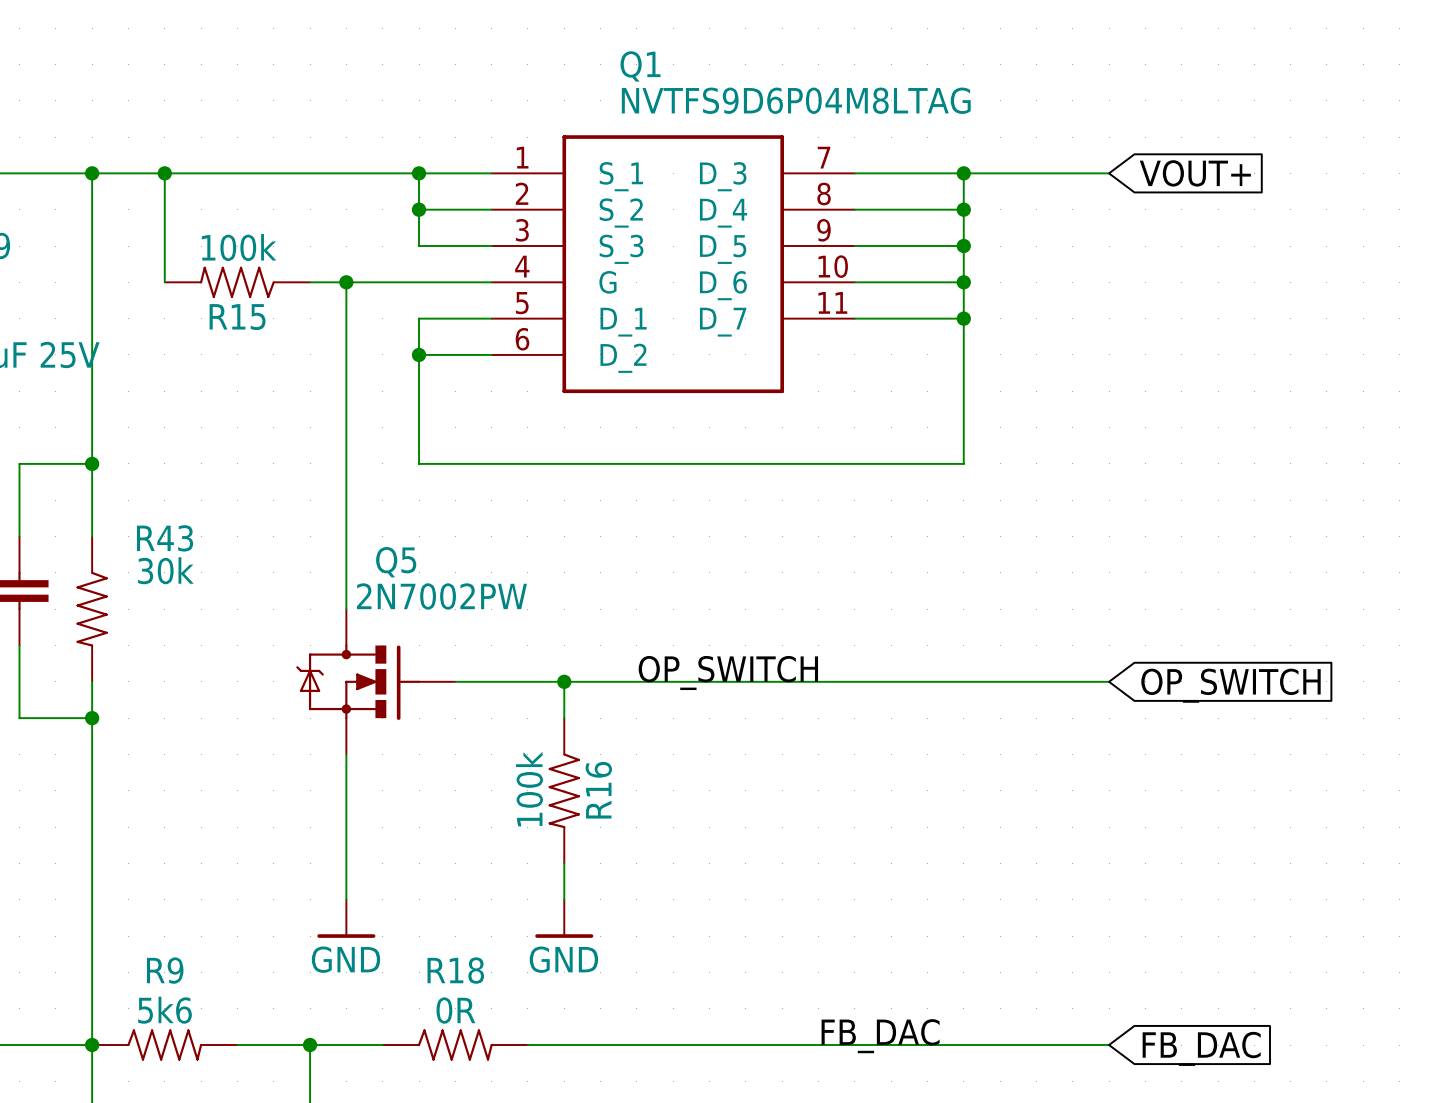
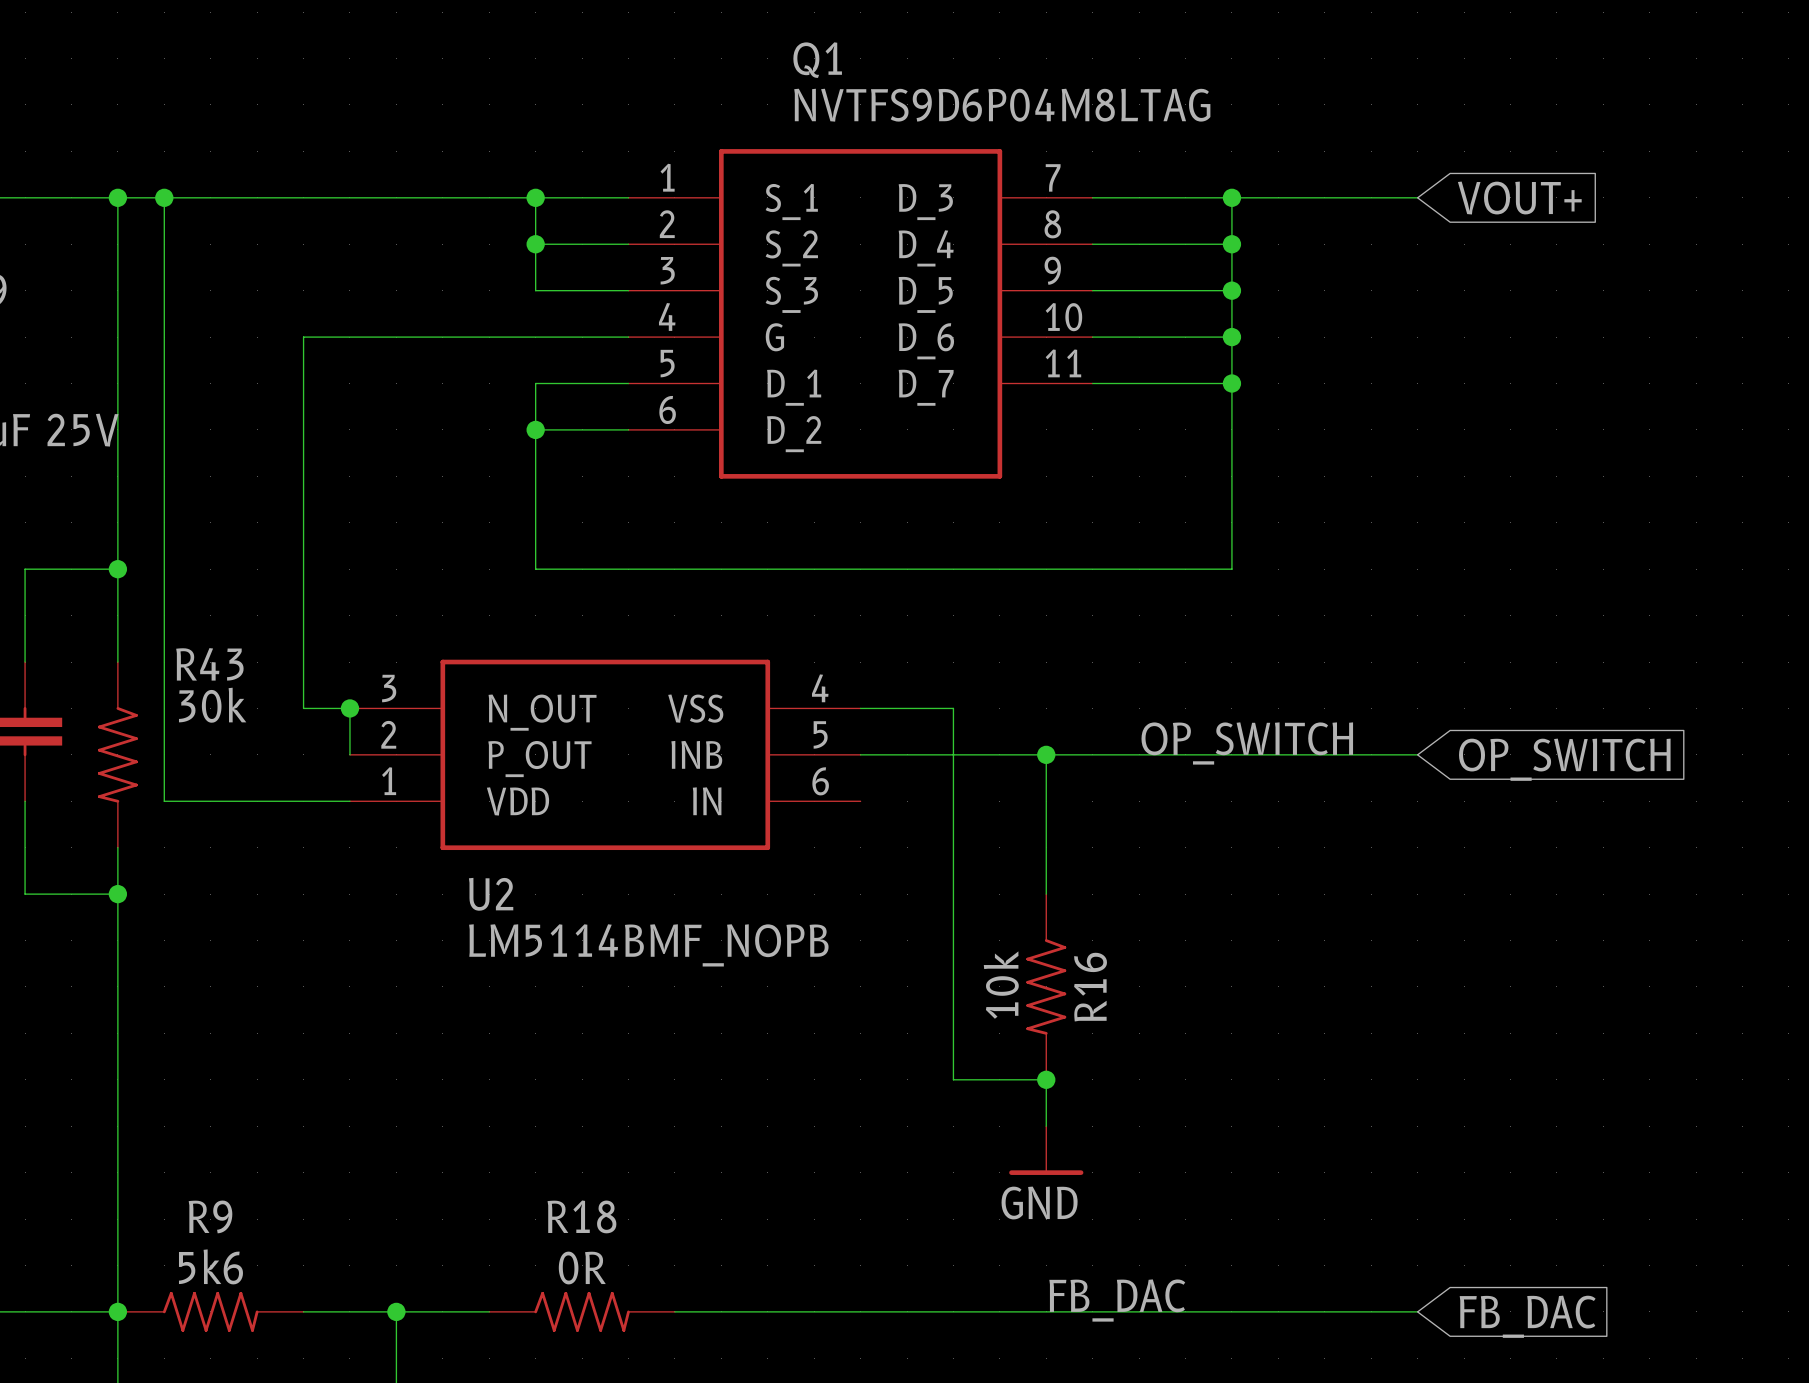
wire: none -> (164, 197) (164, 801) (349, 801)
wire: (164, 173) (164, 282) -> none
junction position: (164, 173) -> (164, 197)
R15: 100k (237, 282) -> none
wire: none -> (396, 337) (303, 337) (303, 708) (349, 708) (349, 754)
wire: (346, 282) (346, 609) -> none
junction: (346, 282) -> none
junction: none -> (349, 708)
wire: none -> (860, 708) (953, 708) (953, 1079) (1046, 1079) (1046, 1126)
U2: none -> LM5114BMF_NOPB (605, 754)
wire: none -> (860, 754) (1417, 754)
wire: none -> (1046, 754) (1046, 894)
junction: none -> (1046, 754)
label position: OP_SWITCH (728, 672) -> OP_SWITCH (1247, 743)
Q5: 2N7002PW (375, 681) -> none
wire: (455, 681) (1109, 681) -> none
wire: (564, 681) (564, 718) -> none
junction: (564, 681) -> none
global label position: OP_SWITCH (1231, 685) -> OP_SWITCH (1564, 759)
wire: (346, 754) (346, 899) -> none
R16 value: 100k (529, 789) -> 10k (1001, 985)
R16 position: (564, 790) -> (1046, 986)
wire: (564, 863) (564, 899) -> none
junction: none -> (1046, 1079)
power symbol: GND (346, 918) -> none
power symbol: GND (564, 918) -> none
power symbol: none -> GND (1046, 1150)

